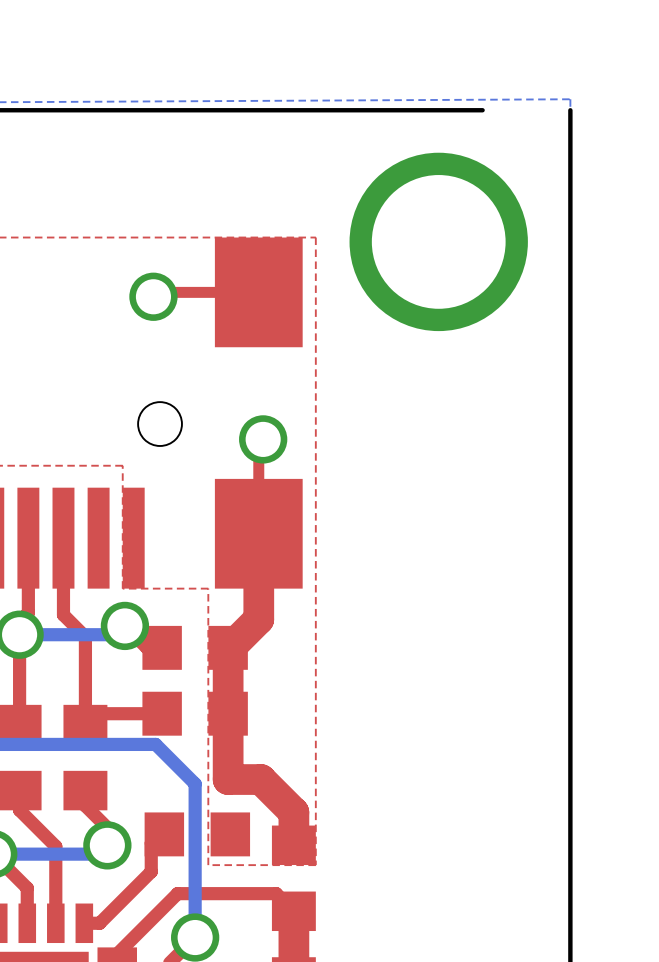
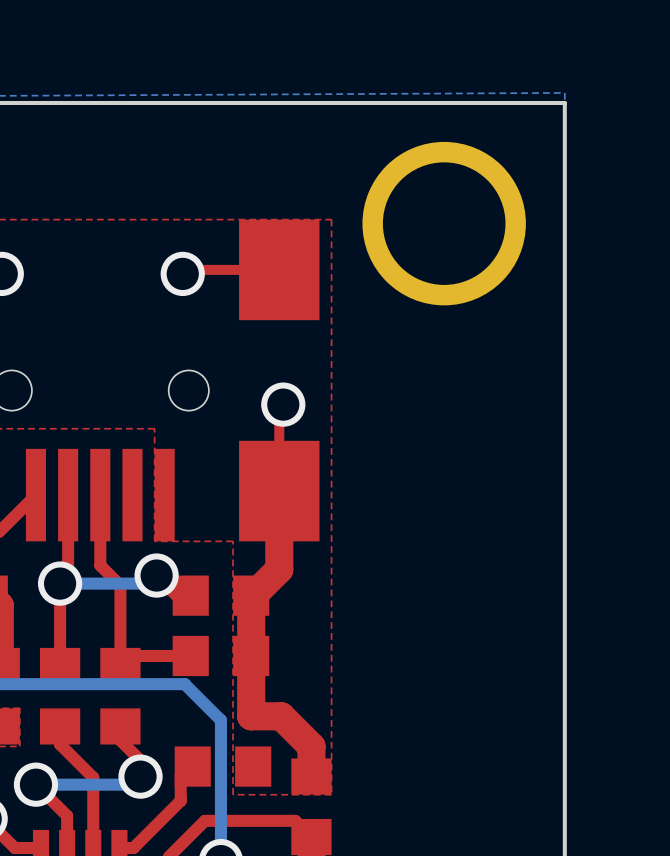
board edge: none -> (564, 102) (484, 102)

